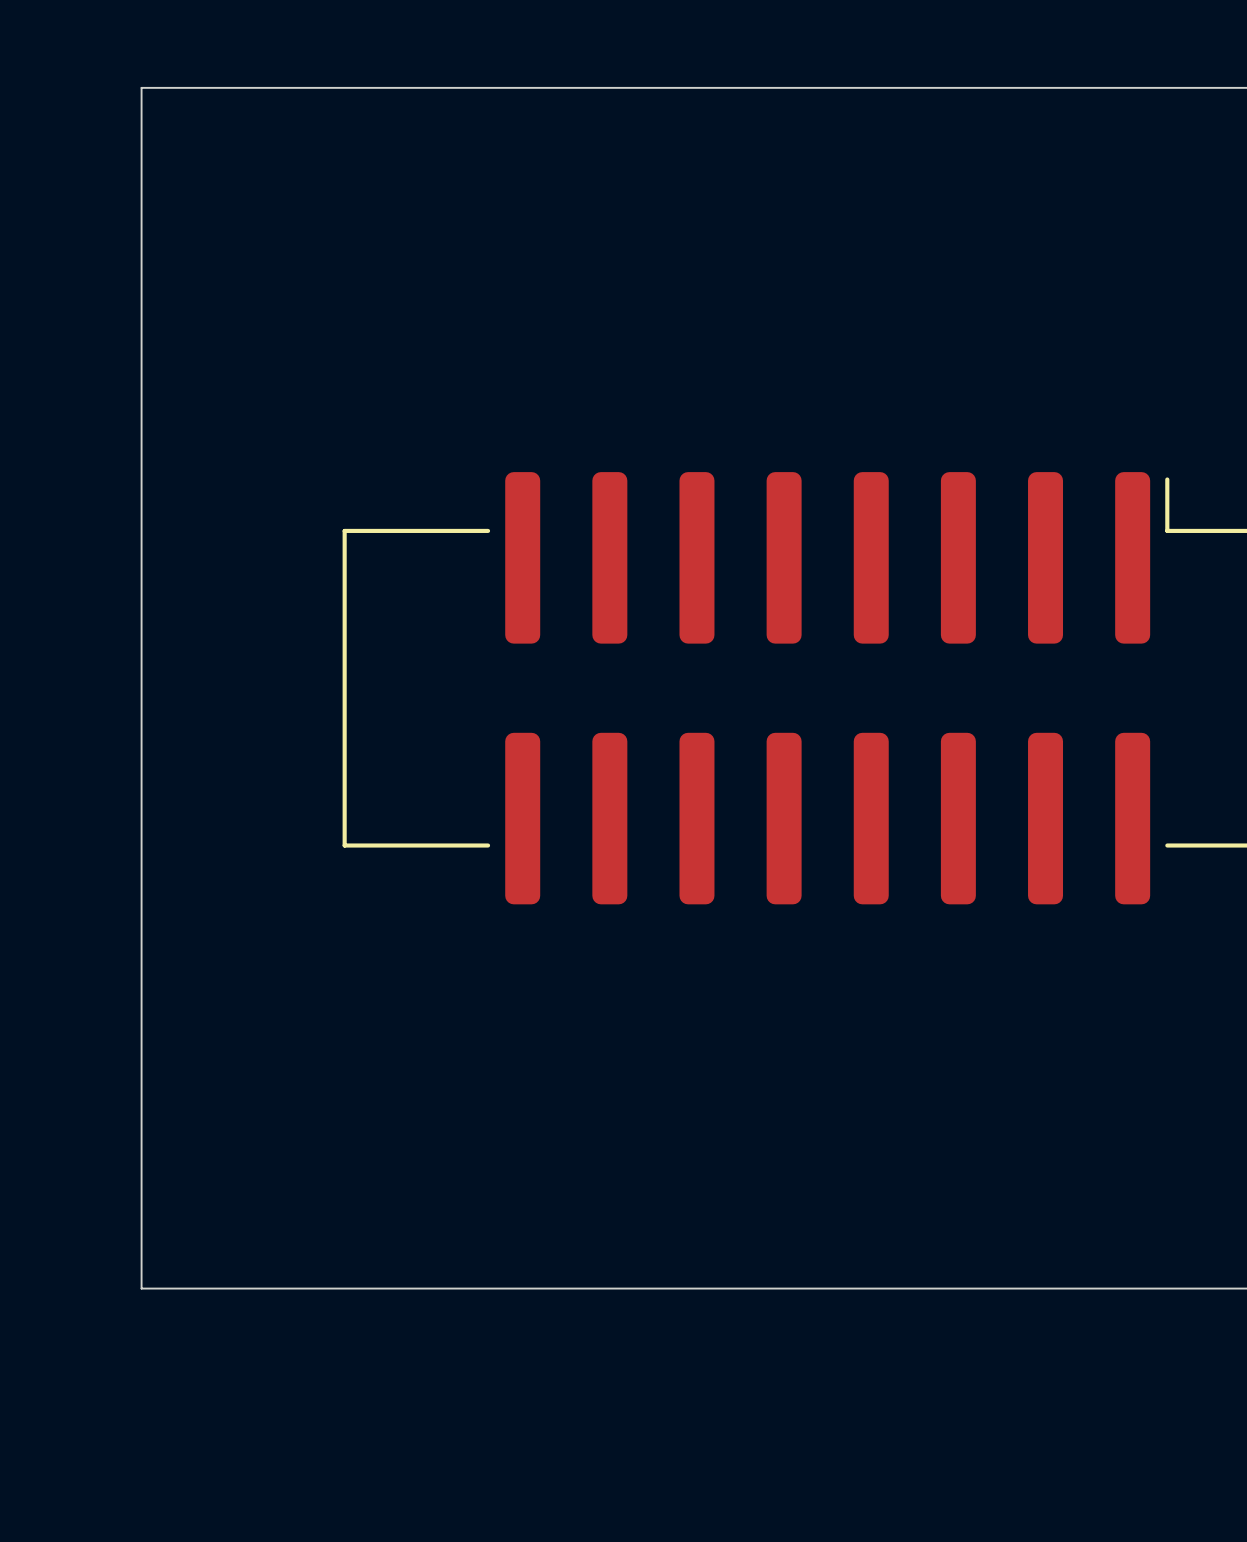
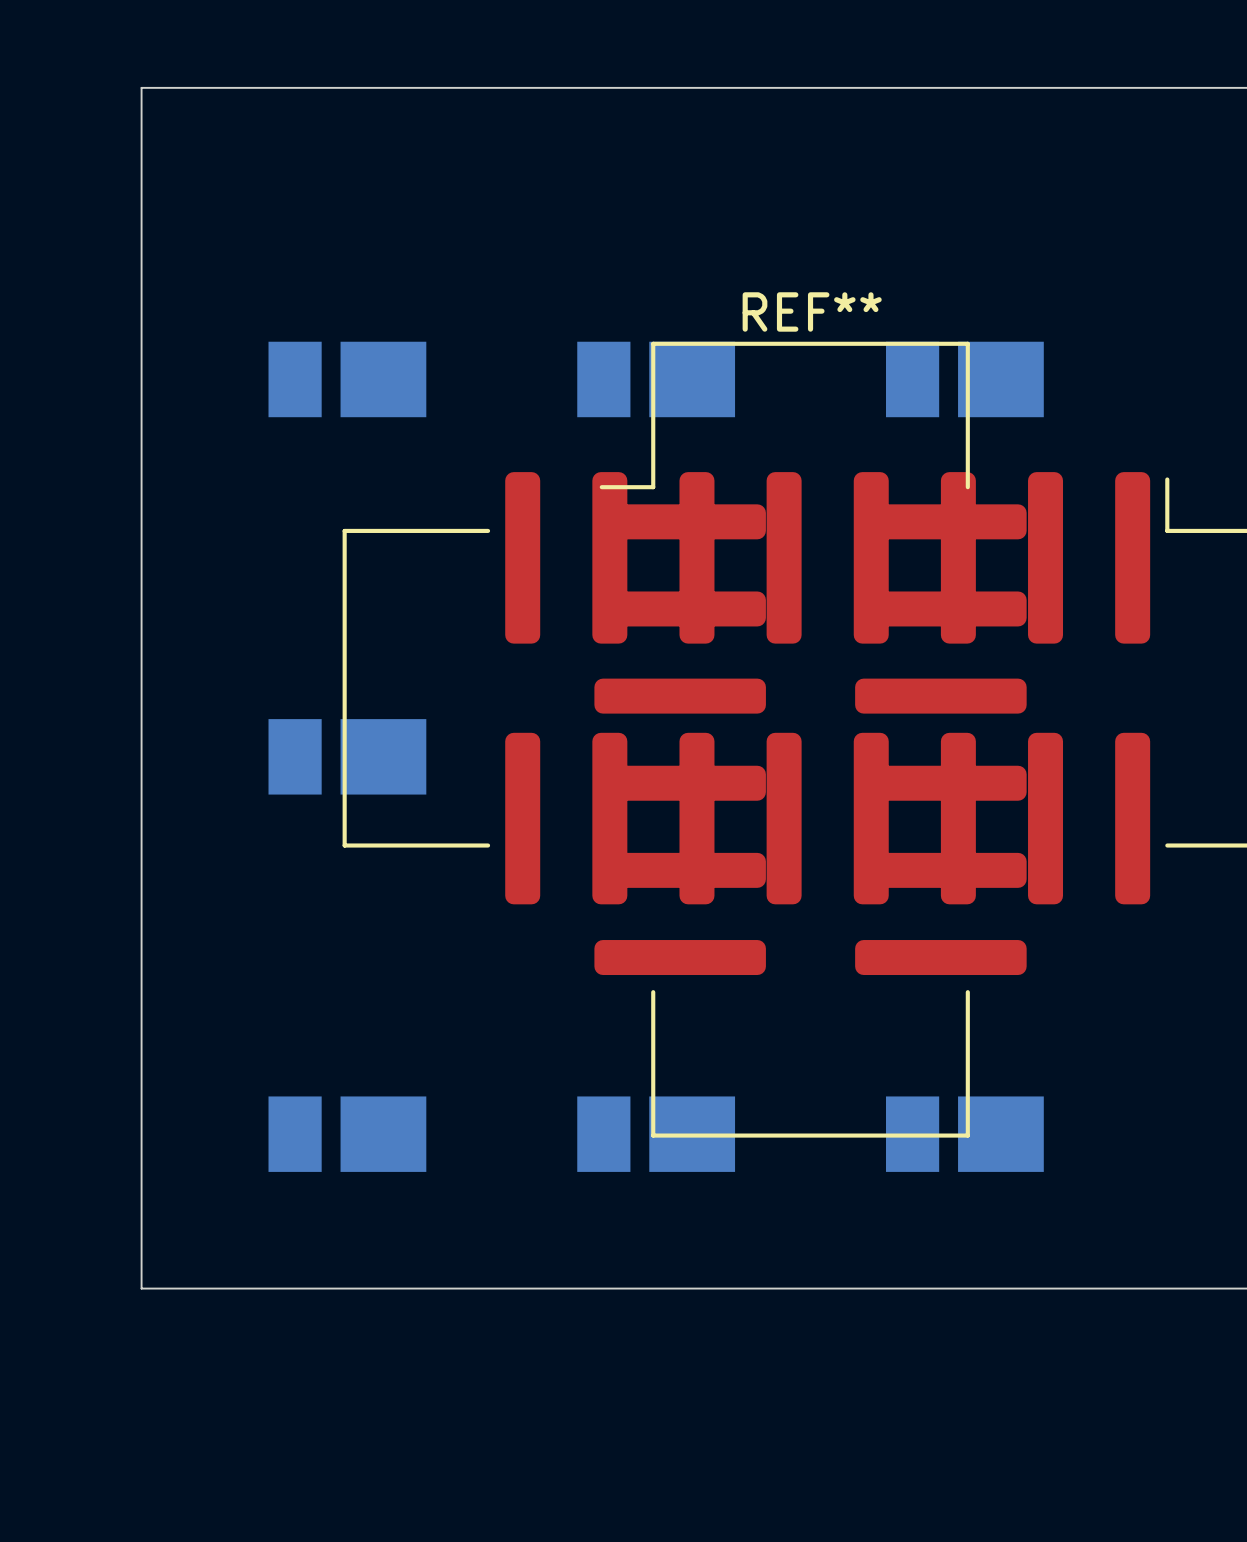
part: none -> (347, 379)
part: none -> (656, 379)
part: none -> (964, 379)
REF**: none -> (810, 739)
part: none -> (347, 756)
part: none -> (347, 1134)
part: none -> (656, 1134)
part: none -> (964, 1134)

